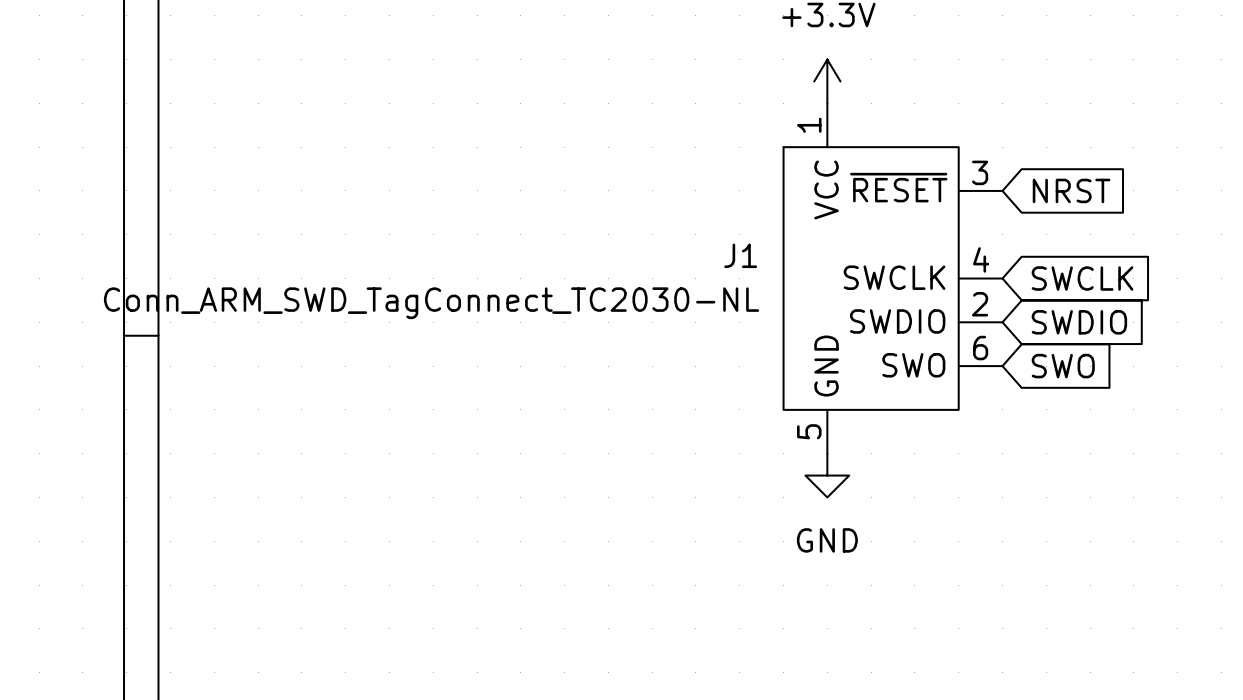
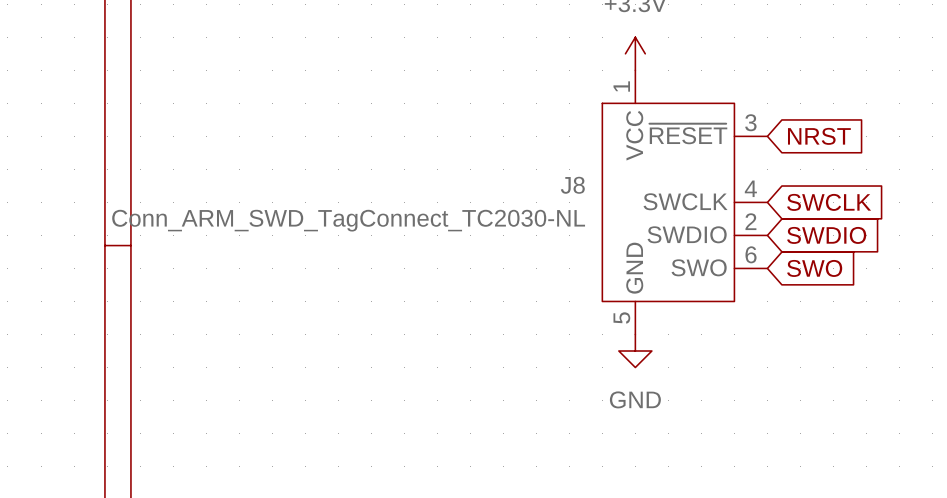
J1 name: J1 (740, 255) -> J8 (572, 185)

